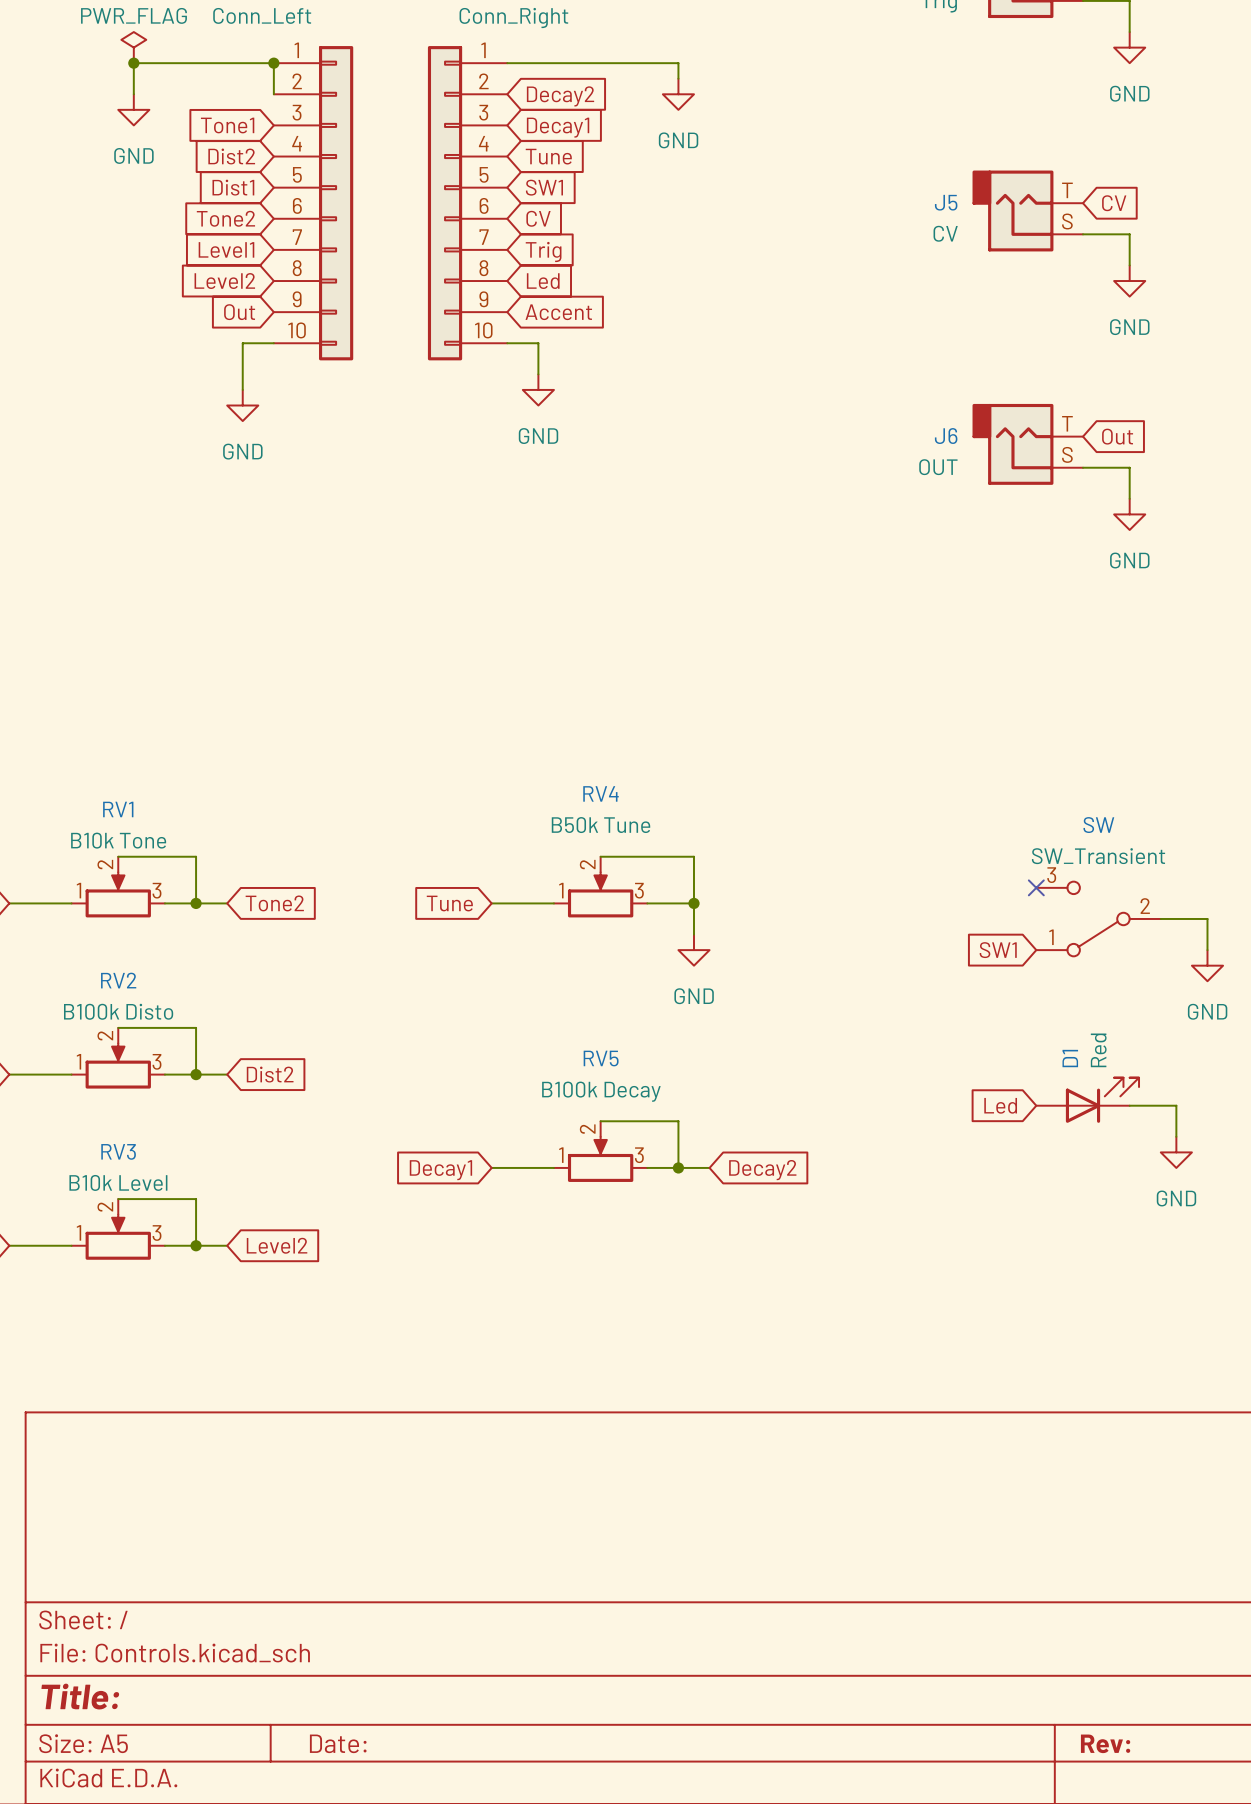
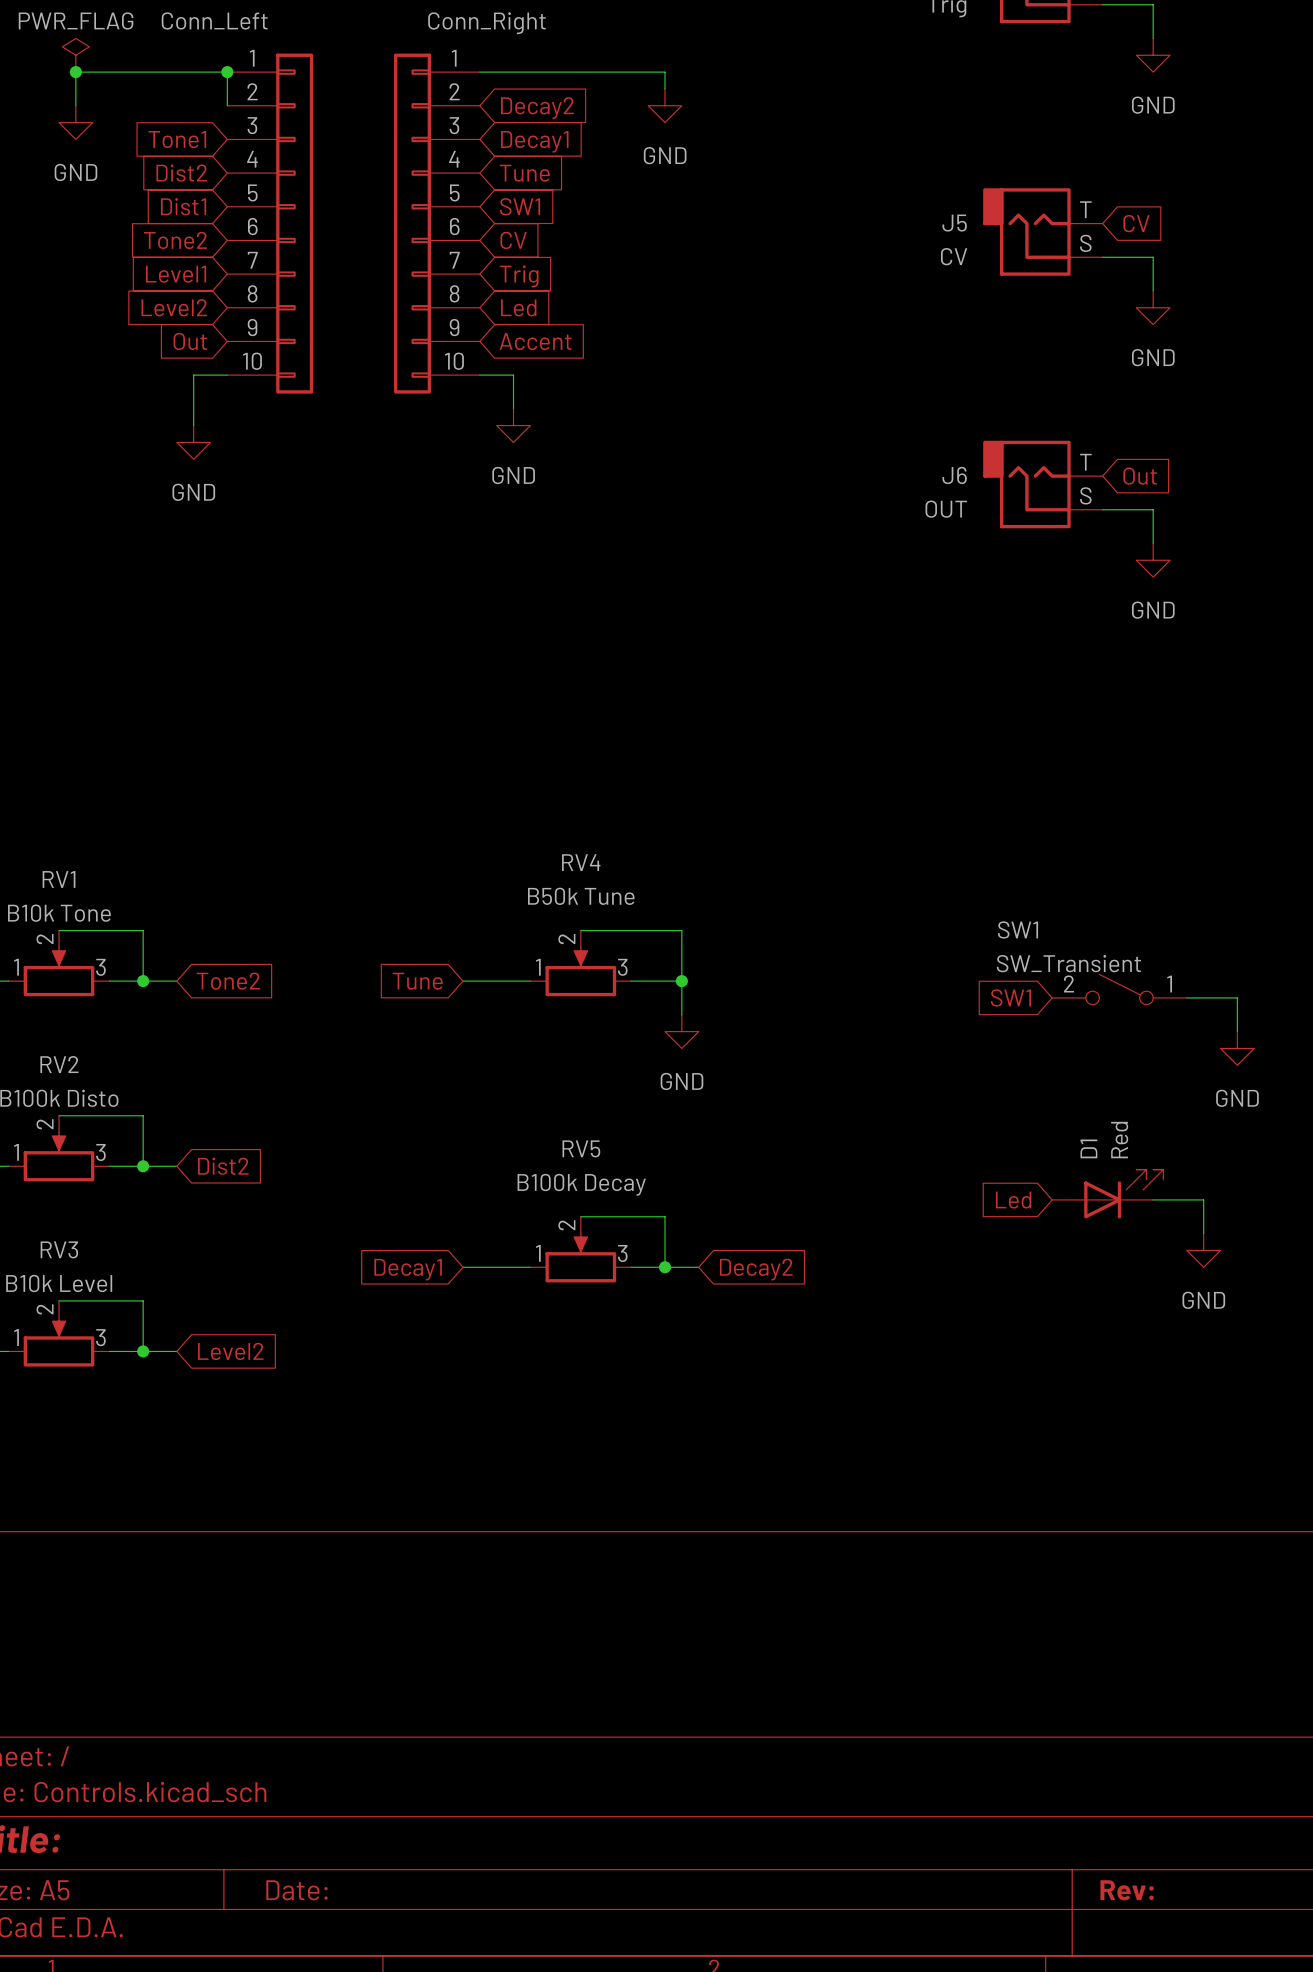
no-connect mark: (1036, 887) -> none
SW1: none -> SW_Transient (1119, 989)
SW: SW_Transient (1098, 918) -> none
global label position: SW1 (998, 950) -> SW1 (1010, 997)

